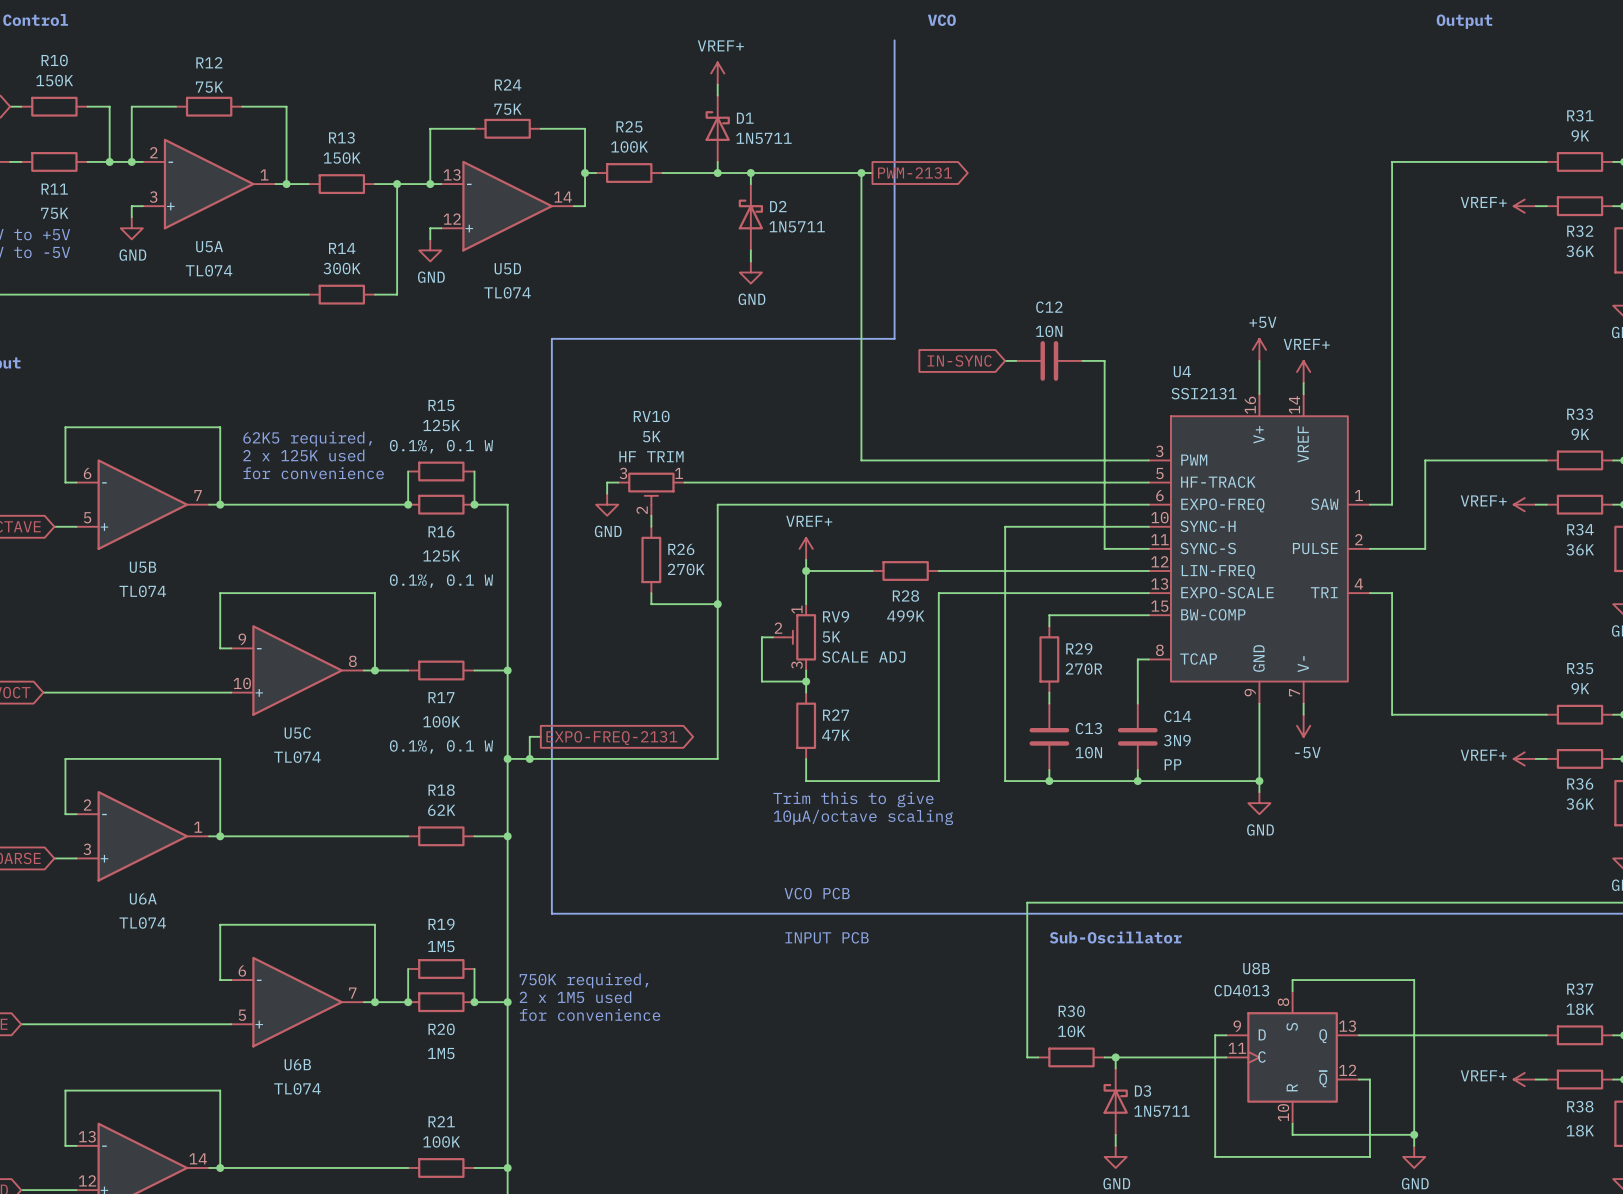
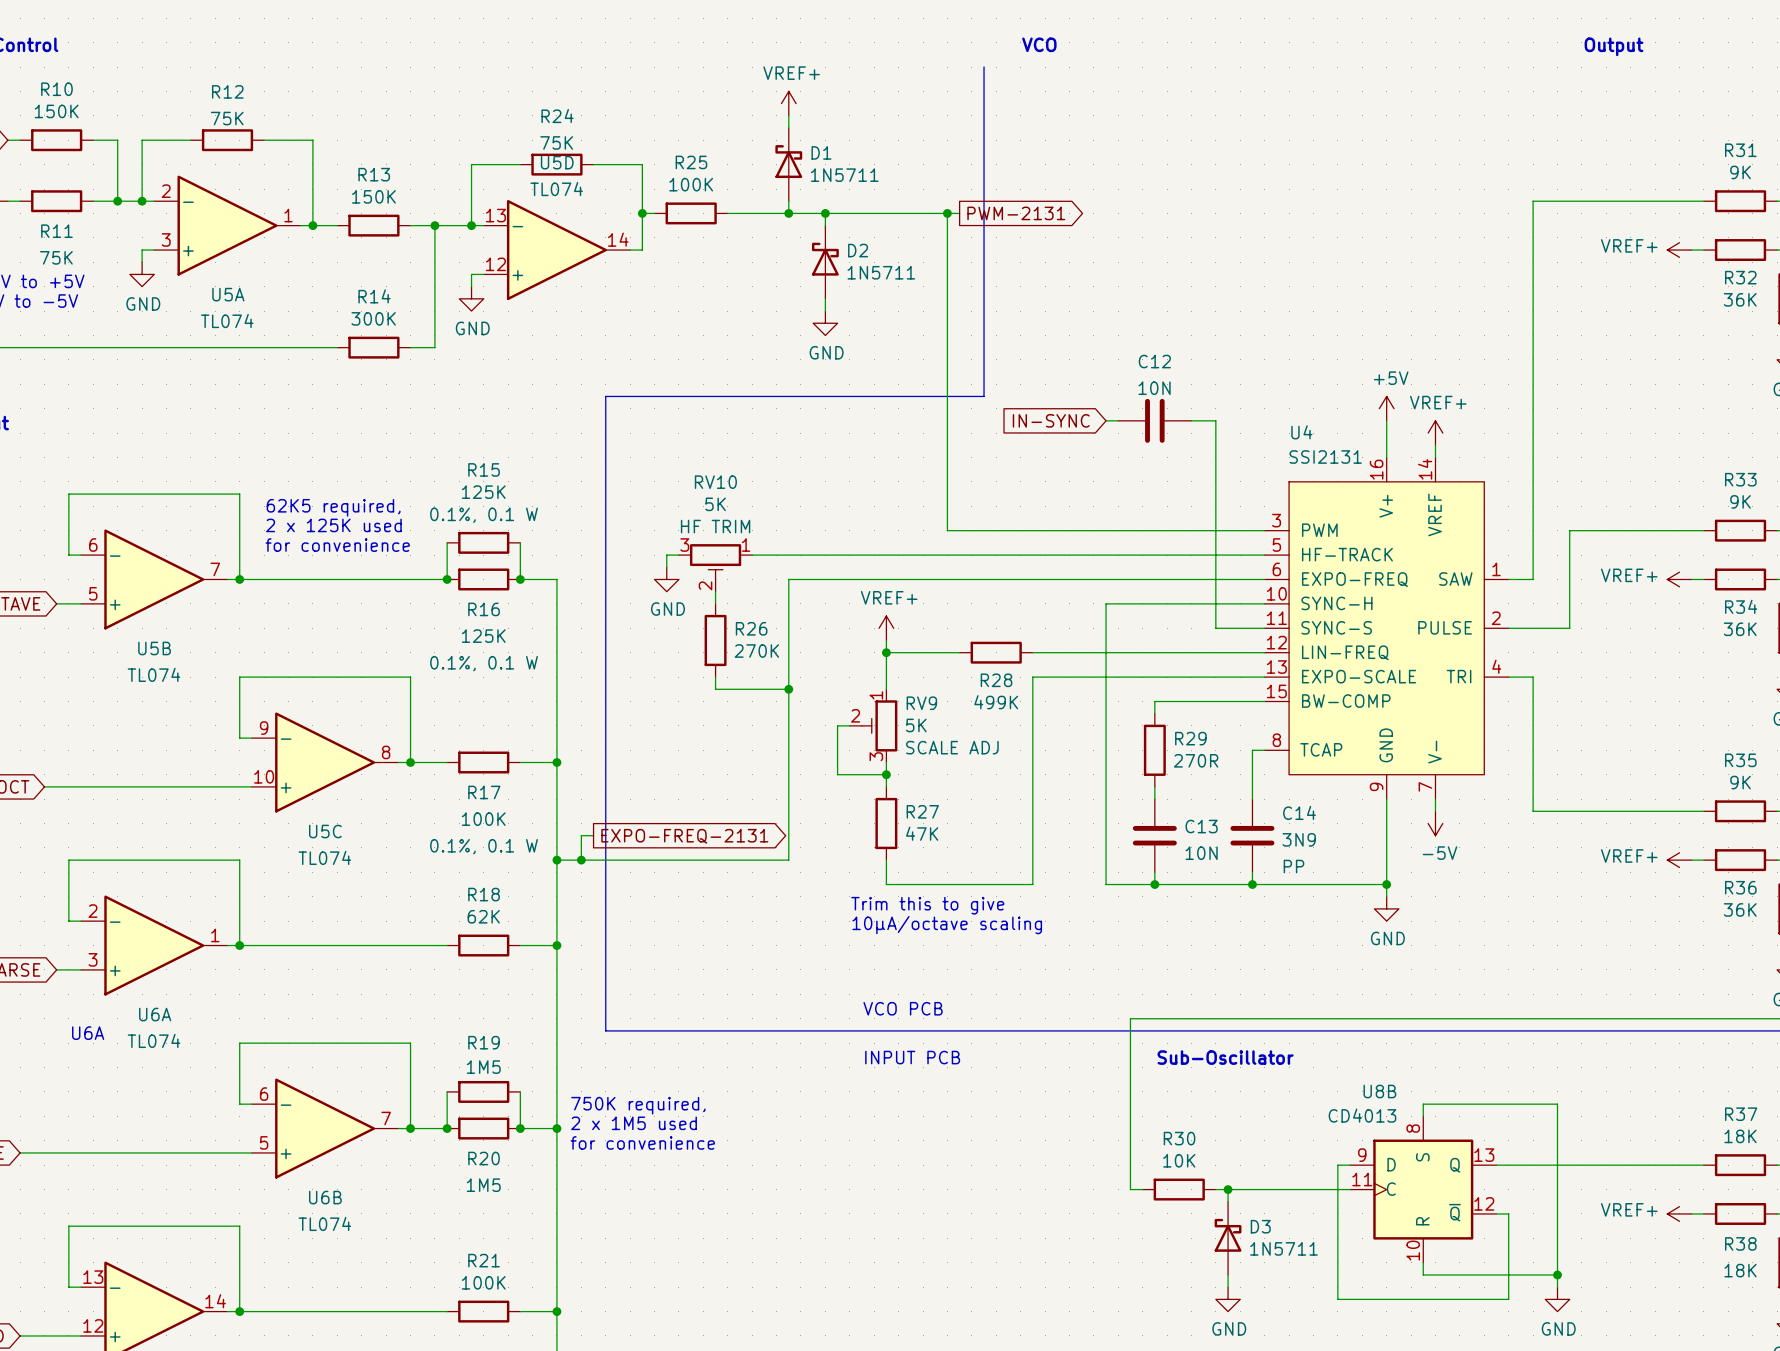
U5D name position: U5D (507, 268) -> U5D (557, 162)
U5D value position: TL074 (507, 292) -> TL074 (556, 189)
text: none -> U6A (88, 1033)

